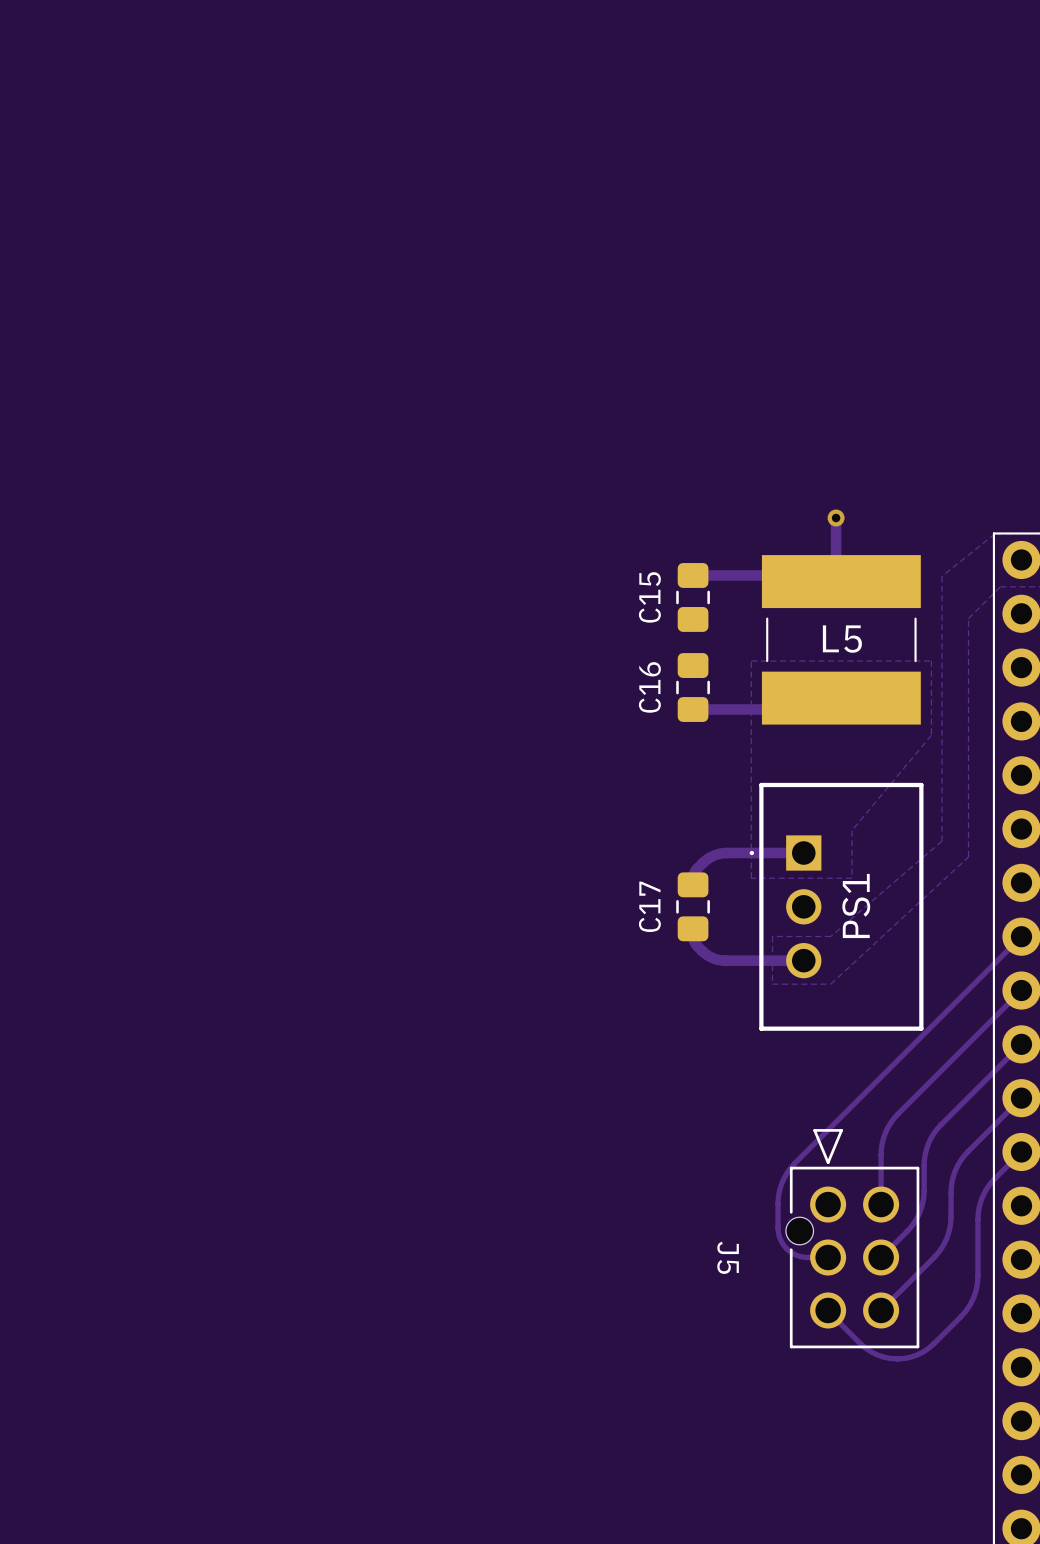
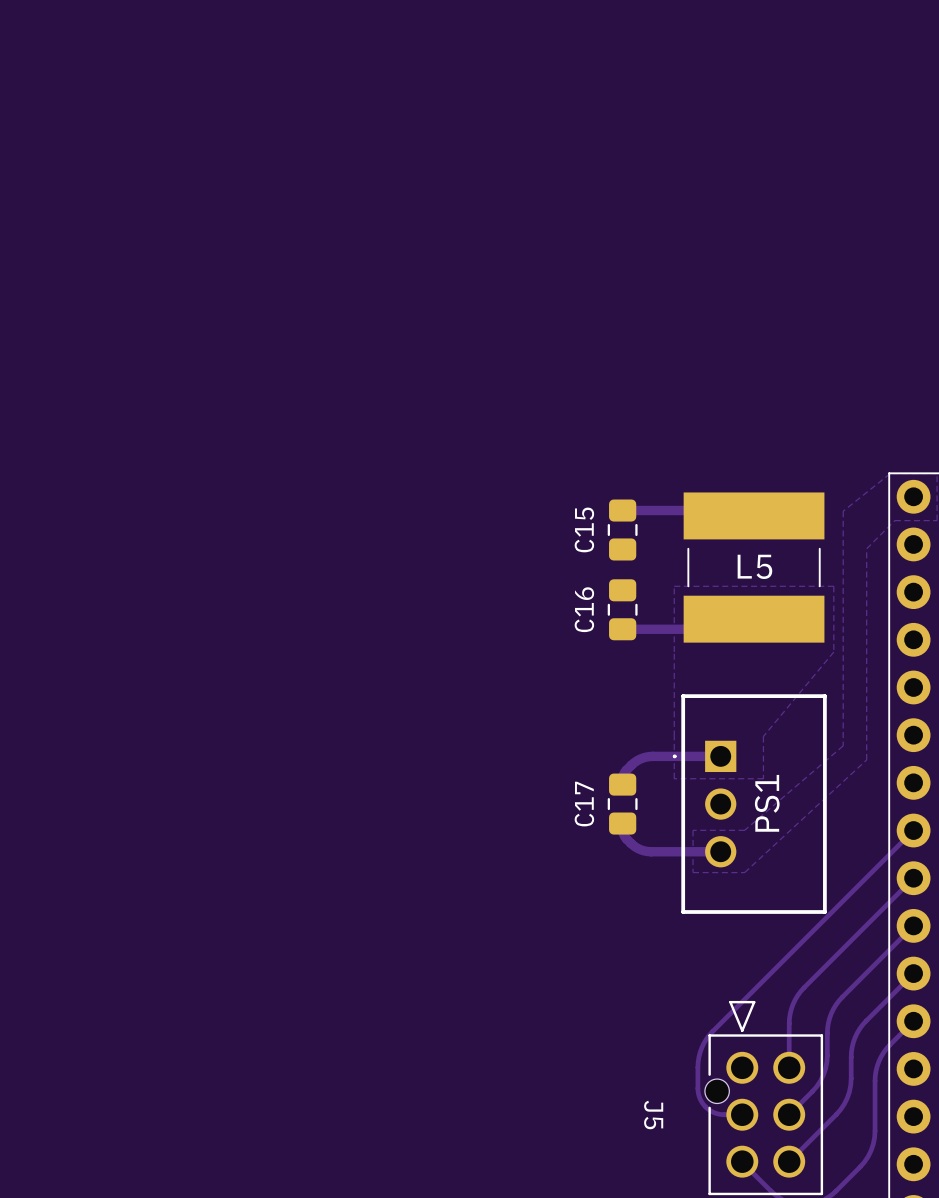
track: (836, 518) (836, 576) -> none
via: (836, 518) -> none

